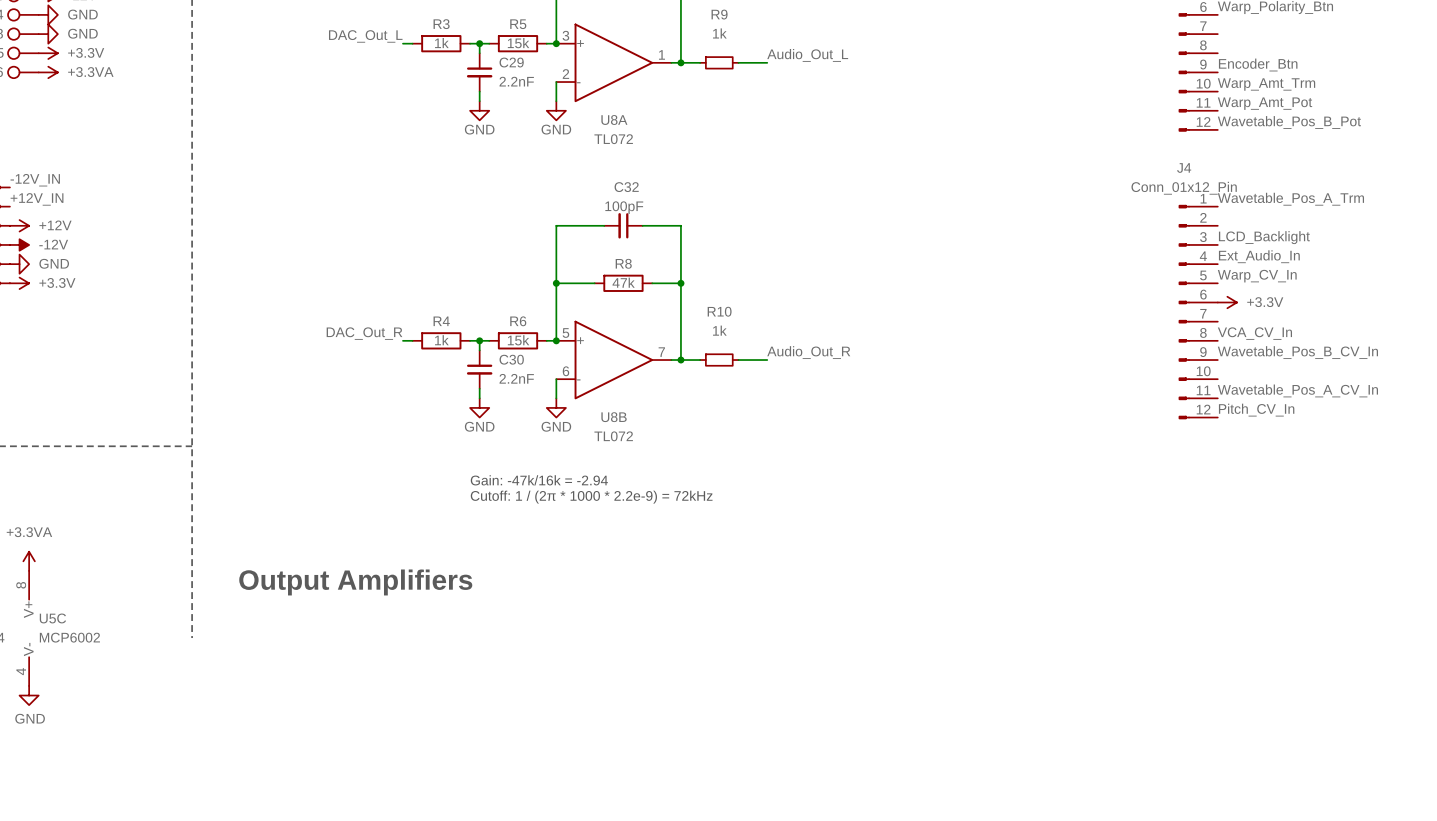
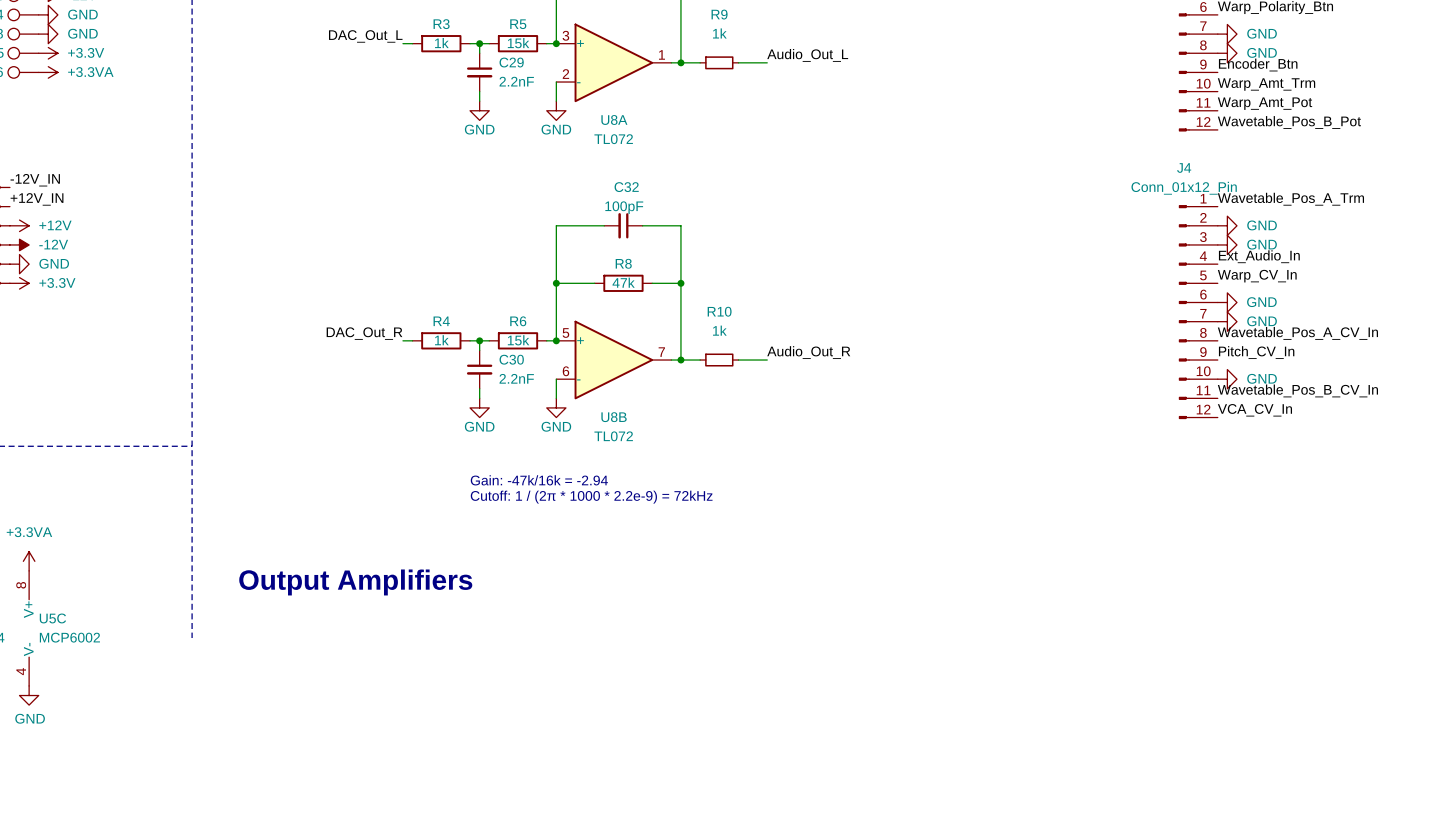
power symbol: none -> GND (1227, 34)
power symbol: none -> GND (1227, 53)
power symbol: none -> GND (1227, 225)
label: LCD_Backlight (1264, 237) -> none
power symbol: none -> GND (1227, 244)
power symbol: +3.3V (1227, 302) -> GND (1227, 302)
power symbol: none -> GND (1227, 321)
label: VCA_CV_In (1254, 333) -> Wavetable_Pos_A_CV_In (1297, 333)
label: Wavetable_Pos_B_CV_In (1297, 352) -> Pitch_CV_In (1256, 352)
power symbol: none -> GND (1227, 379)
label: Wavetable_Pos_A_CV_In (1297, 390) -> Wavetable_Pos_B_CV_In (1297, 390)
label: Pitch_CV_In (1256, 410) -> VCA_CV_In (1254, 410)

